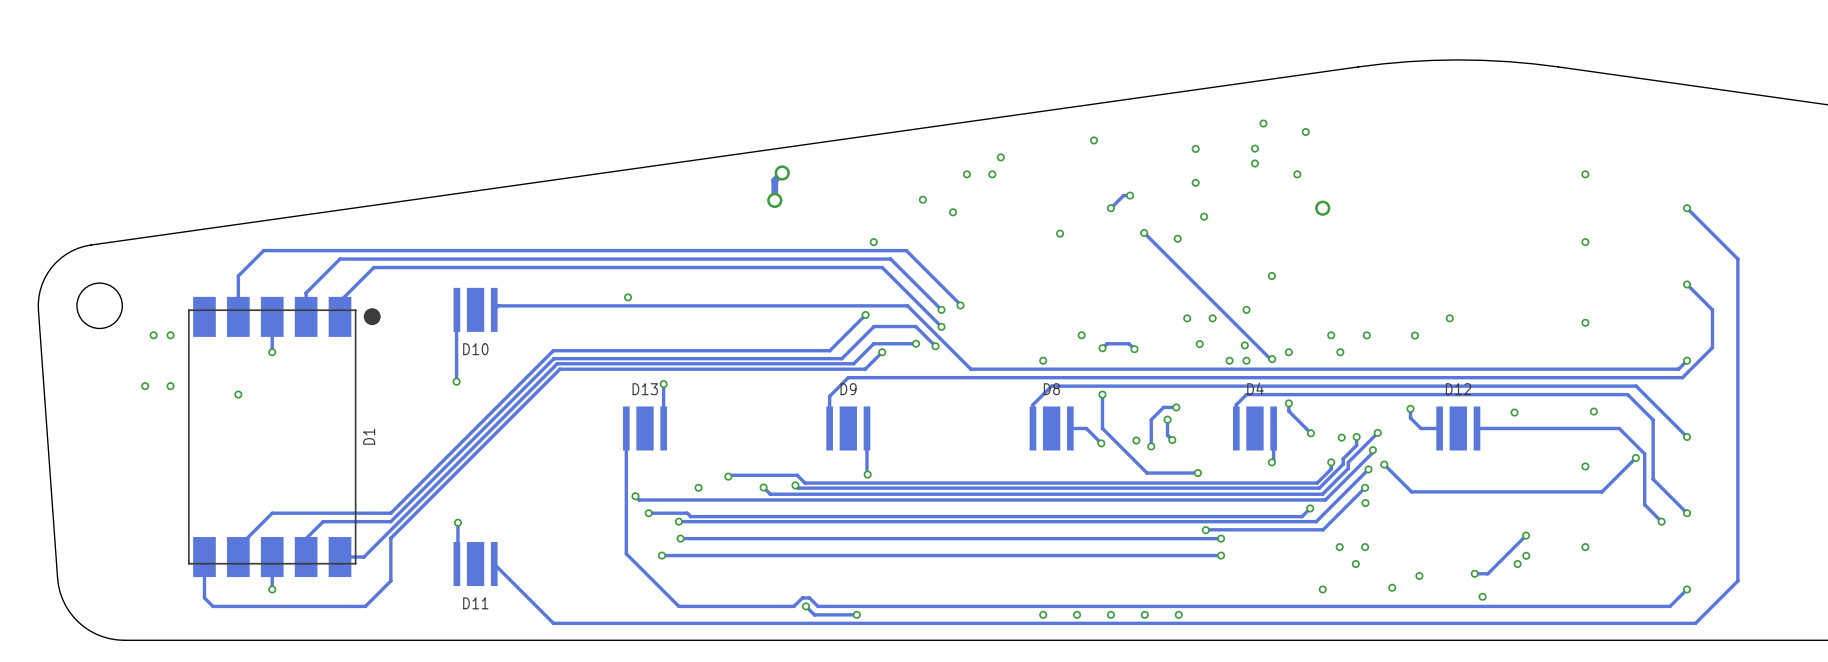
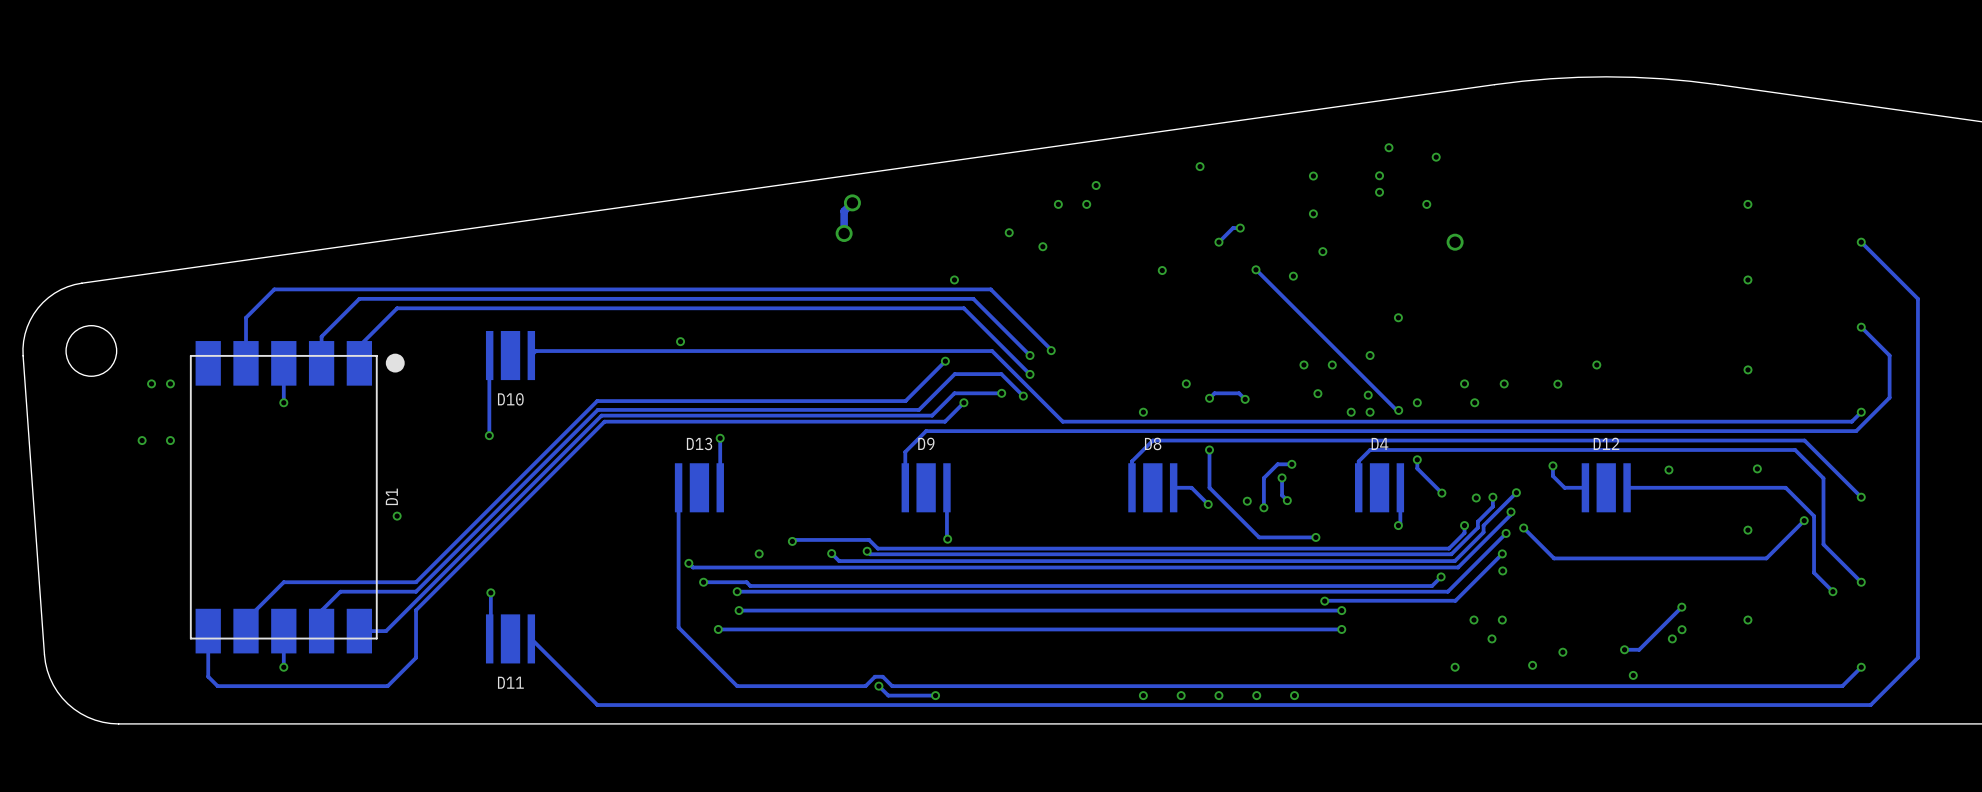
via: (238, 394) -> none
via: none -> (397, 516)

